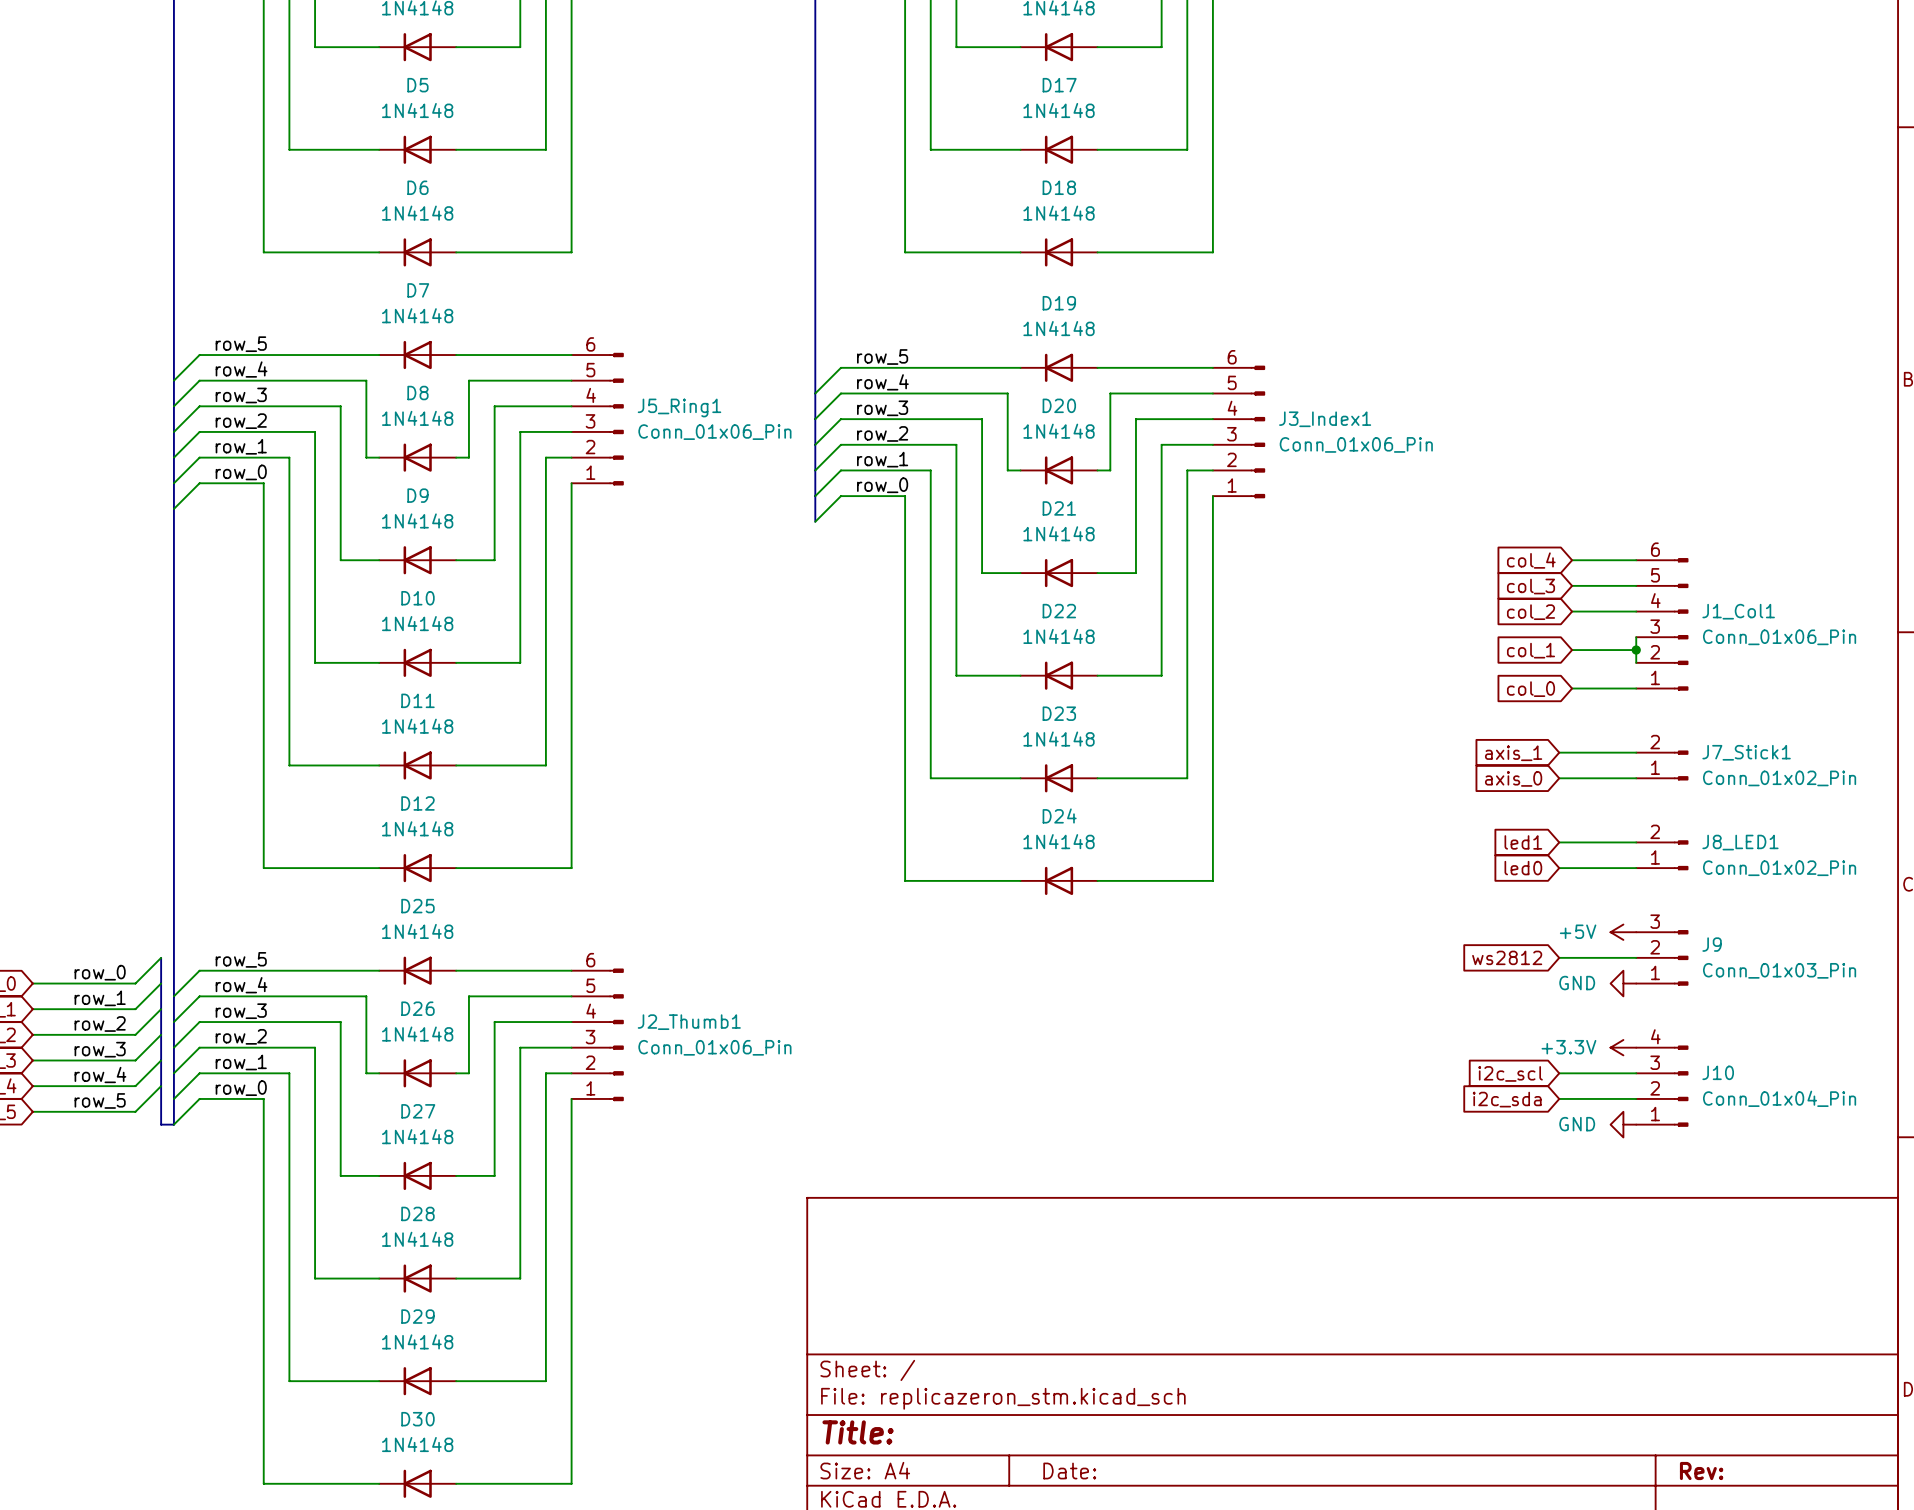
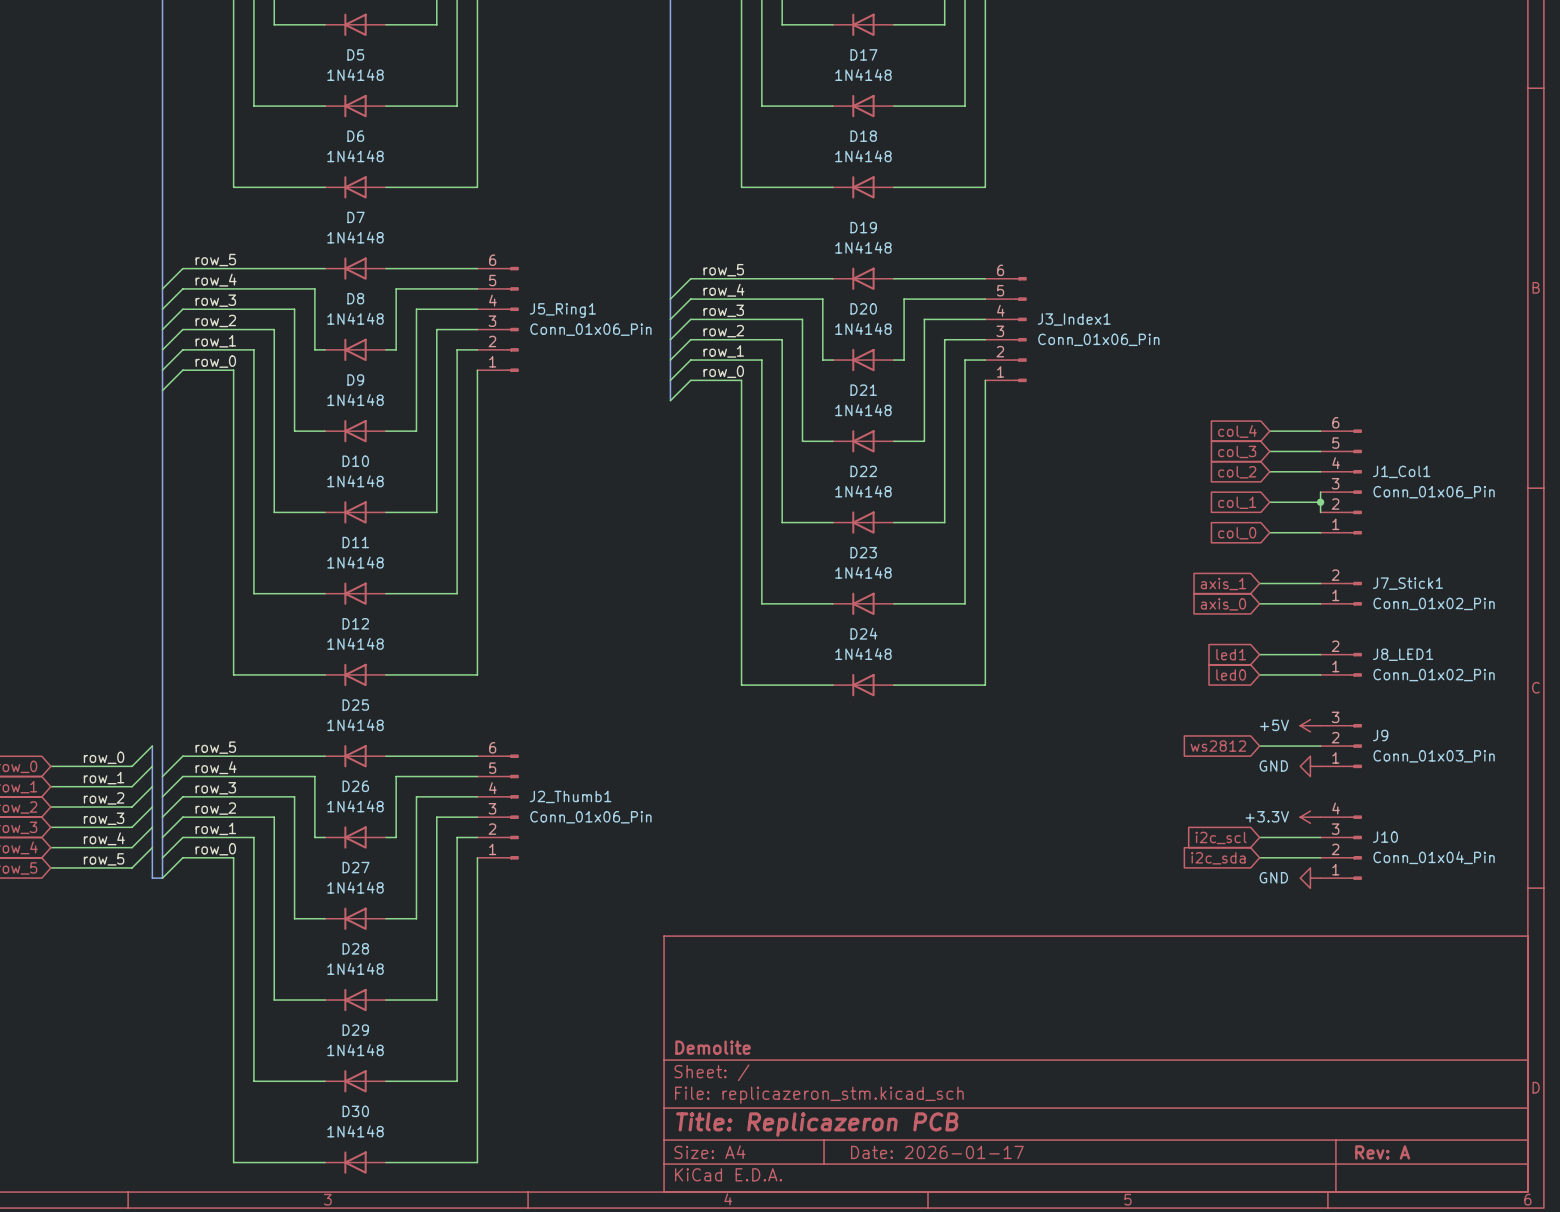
title block: none -> Demolite (713, 1047)
title block: Title: (858, 1432) -> Title: Replicazeron PCB (817, 1124)
title block: Date: (1069, 1471) -> Date: 2026-01-17 (937, 1152)
title block: Rev: (1701, 1471) -> Rev: A (1382, 1152)

